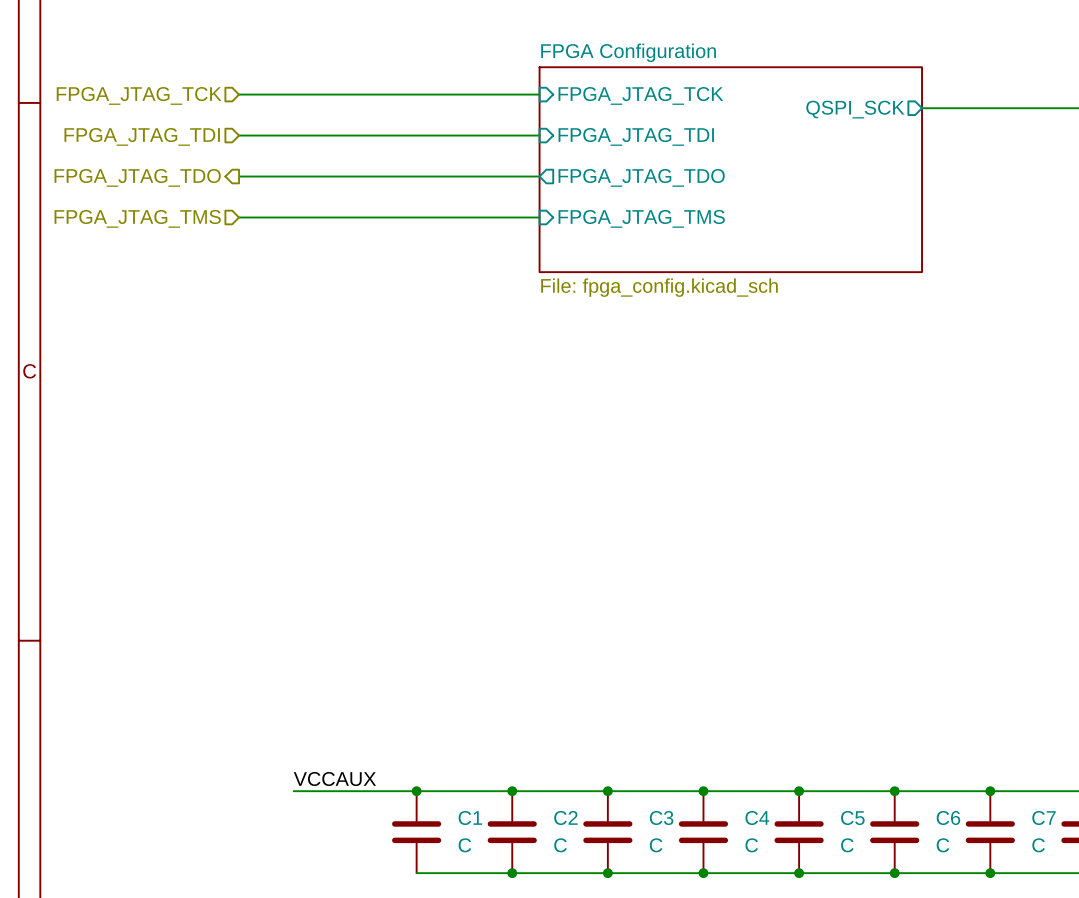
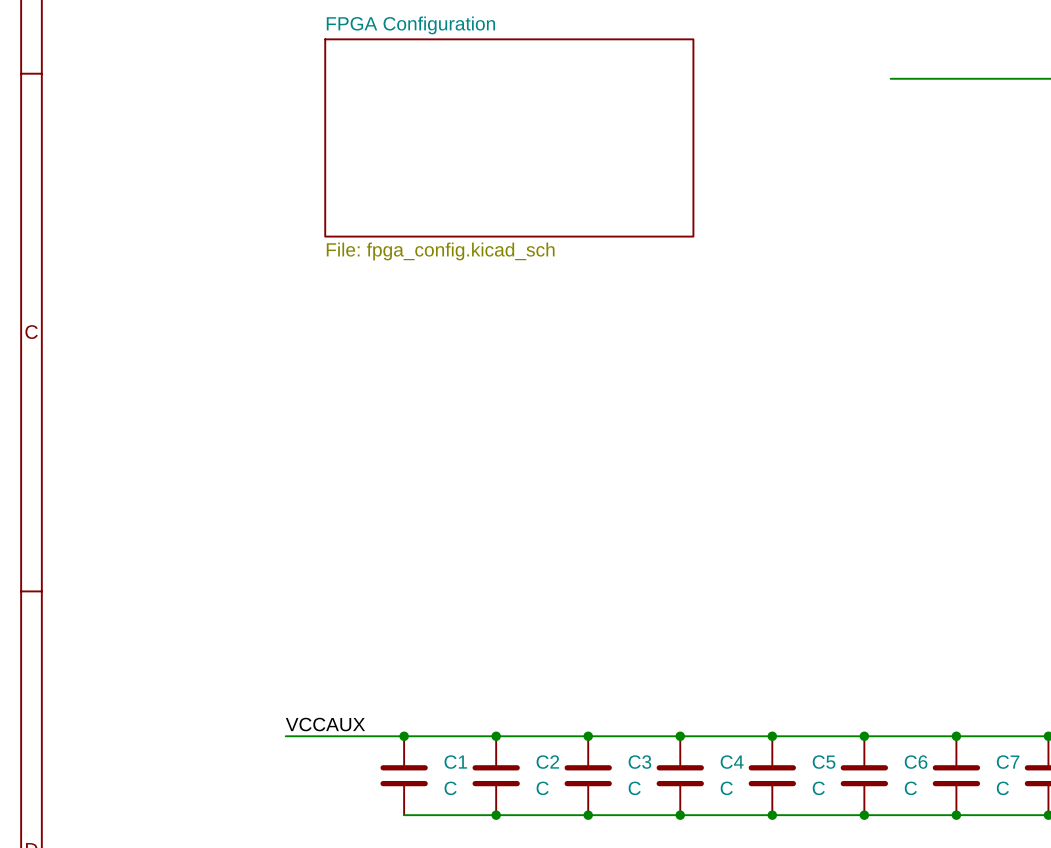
wire: (239, 94) (539, 94) -> none
hierarchical label: FPGA_JTAG_TCK (139, 95) -> none
sheet pin: FPGA_JTAG_TCK (640, 95) -> none
sheet pin: QSPI_SCK (855, 109) -> none
wire: (239, 135) (539, 135) -> none
hierarchical label: FPGA_JTAG_TDI (142, 136) -> none
sheet pin: FPGA_JTAG_TDI (636, 136) -> none
sheet FPGA Configuration position: (730, 169) -> (509, 137)
wire: (239, 176) (539, 176) -> none
hierarchical label: FPGA_JTAG_TDO (137, 177) -> none
sheet pin: FPGA_JTAG_TDO (641, 177) -> none
wire: (239, 217) (539, 217) -> none
hierarchical label: FPGA_JTAG_TMS (137, 218) -> none
sheet pin: FPGA_JTAG_TMS (641, 218) -> none

